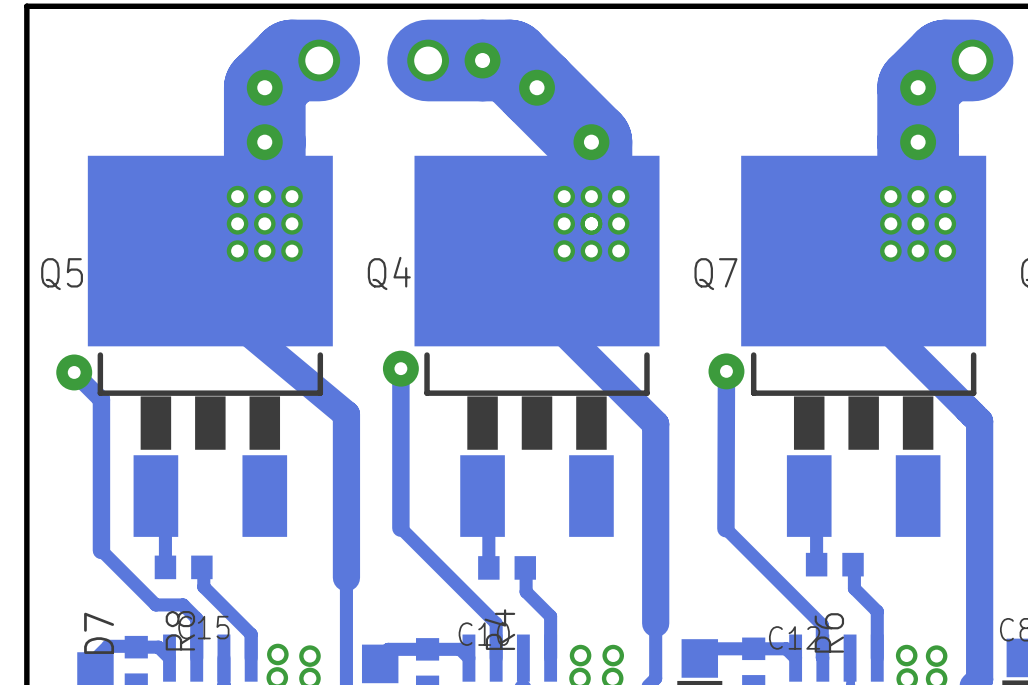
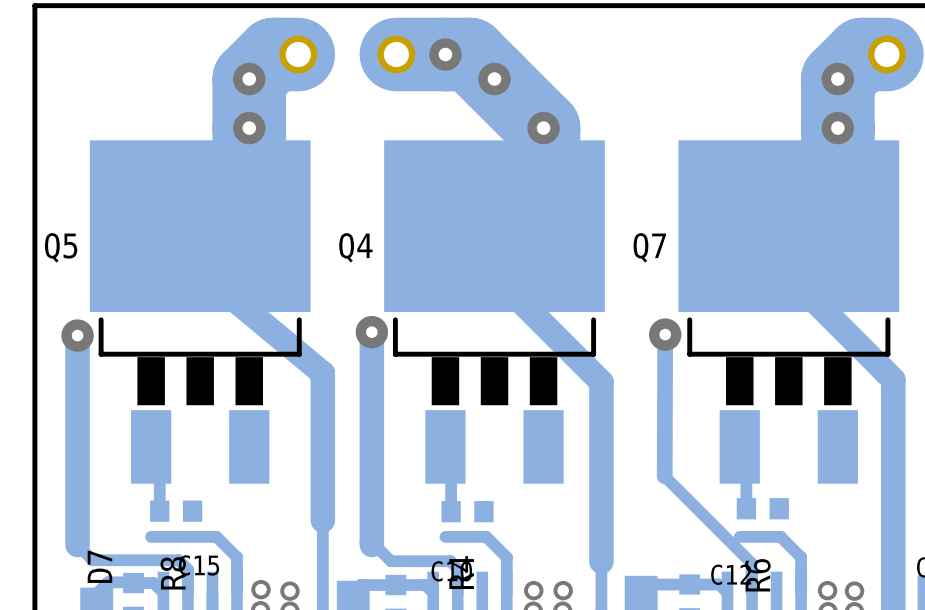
via: (237, 196) -> none
via: (264, 196) -> none
via: (292, 196) -> none
via: (564, 196) -> none
via: (591, 196) -> none
via: (618, 196) -> none
via: (890, 196) -> none
via: (918, 196) -> none
via: (945, 196) -> none
via: (237, 223) -> none
via: (264, 223) -> none
via: (292, 223) -> none
via: (564, 223) -> none
via: (591, 223) -> none
via: (618, 223) -> none
via: (890, 223) -> none
via: (918, 223) -> none
via: (945, 223) -> none
via: (237, 251) -> none
via: (264, 251) -> none
via: (292, 251) -> none
via: (564, 251) -> none
via: (591, 251) -> none
via: (618, 251) -> none
via: (890, 251) -> none
via: (918, 251) -> none
via: (945, 251) -> none
track width: thin (400, 368) (400, 528) -> thick (371, 332) (371, 475)
track: (74, 372) (101, 399) (101, 550) (155, 604) (183, 604) (196, 618) (196, 632) -> (77, 335) (77, 545) (92, 560) (178, 560) (187, 569)
track: (400, 528) (496, 623) (496, 631) -> (371, 542) (391, 561) (450, 561) (457, 568)
track: none -> (371, 475) (371, 545)
track: (853, 564) (854, 588) (877, 611) (877, 618) -> (739, 536) (780, 536) (801, 557)
track: (201, 567) (203, 569) (203, 586) (251, 634) -> (151, 536) (216, 536) (236, 557) (236, 571)
track: (525, 567) (526, 591) (550, 618) -> (445, 536) (486, 536) (506, 557)

